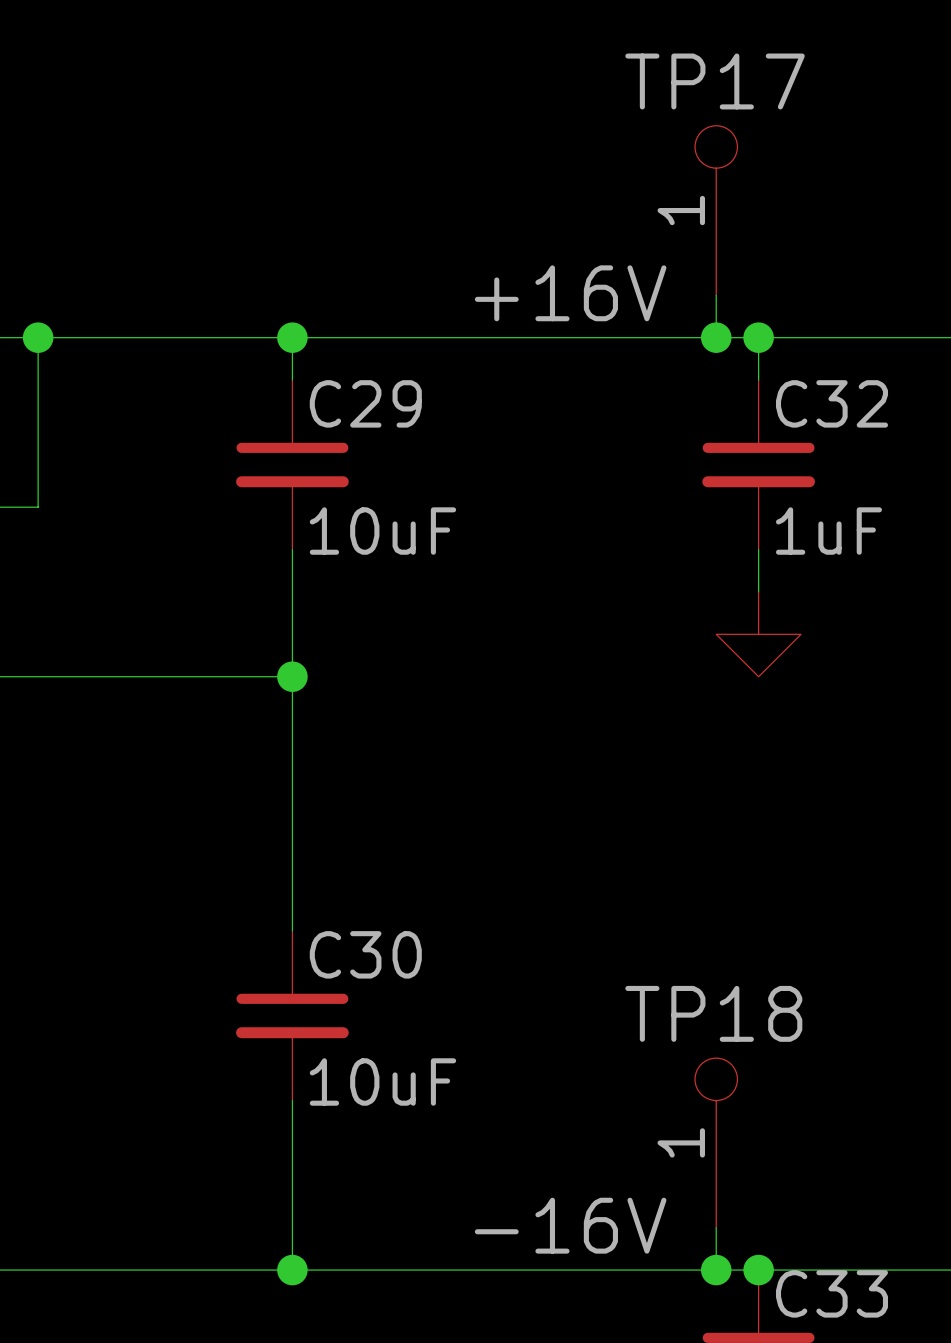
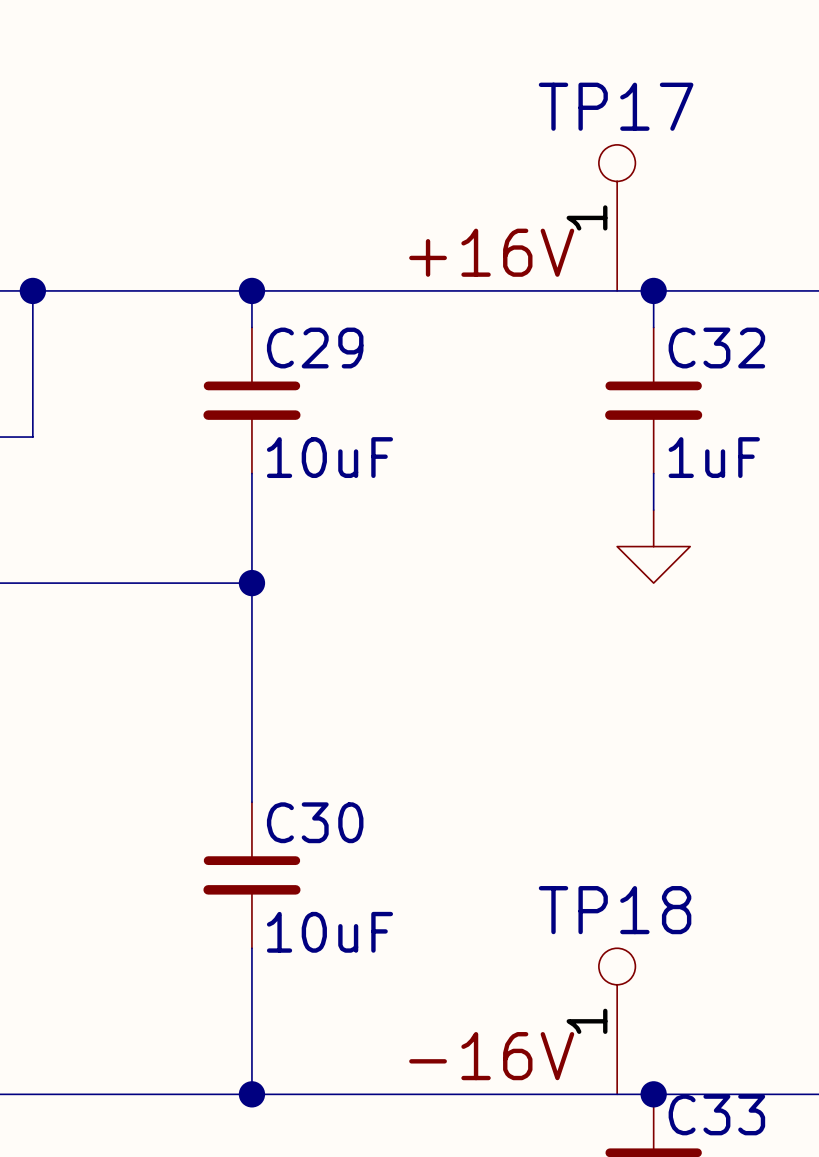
TP17 position: (716, 210) -> (617, 217)
junction: (716, 337) -> none
TP18 position: (716, 1142) -> (617, 1021)
junction: (716, 1270) -> none

